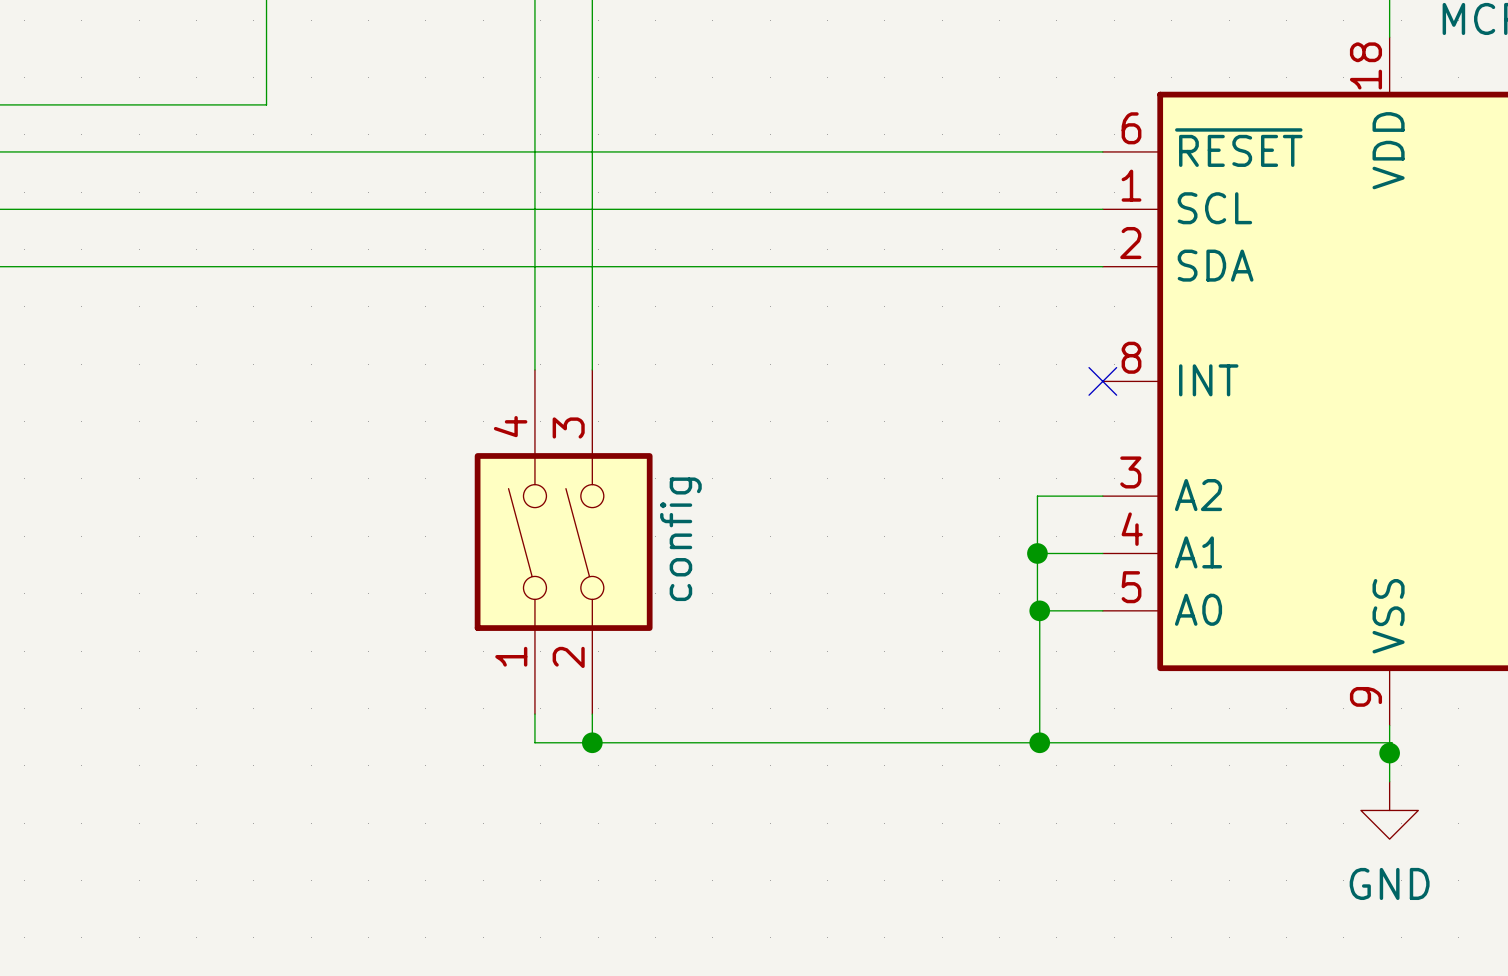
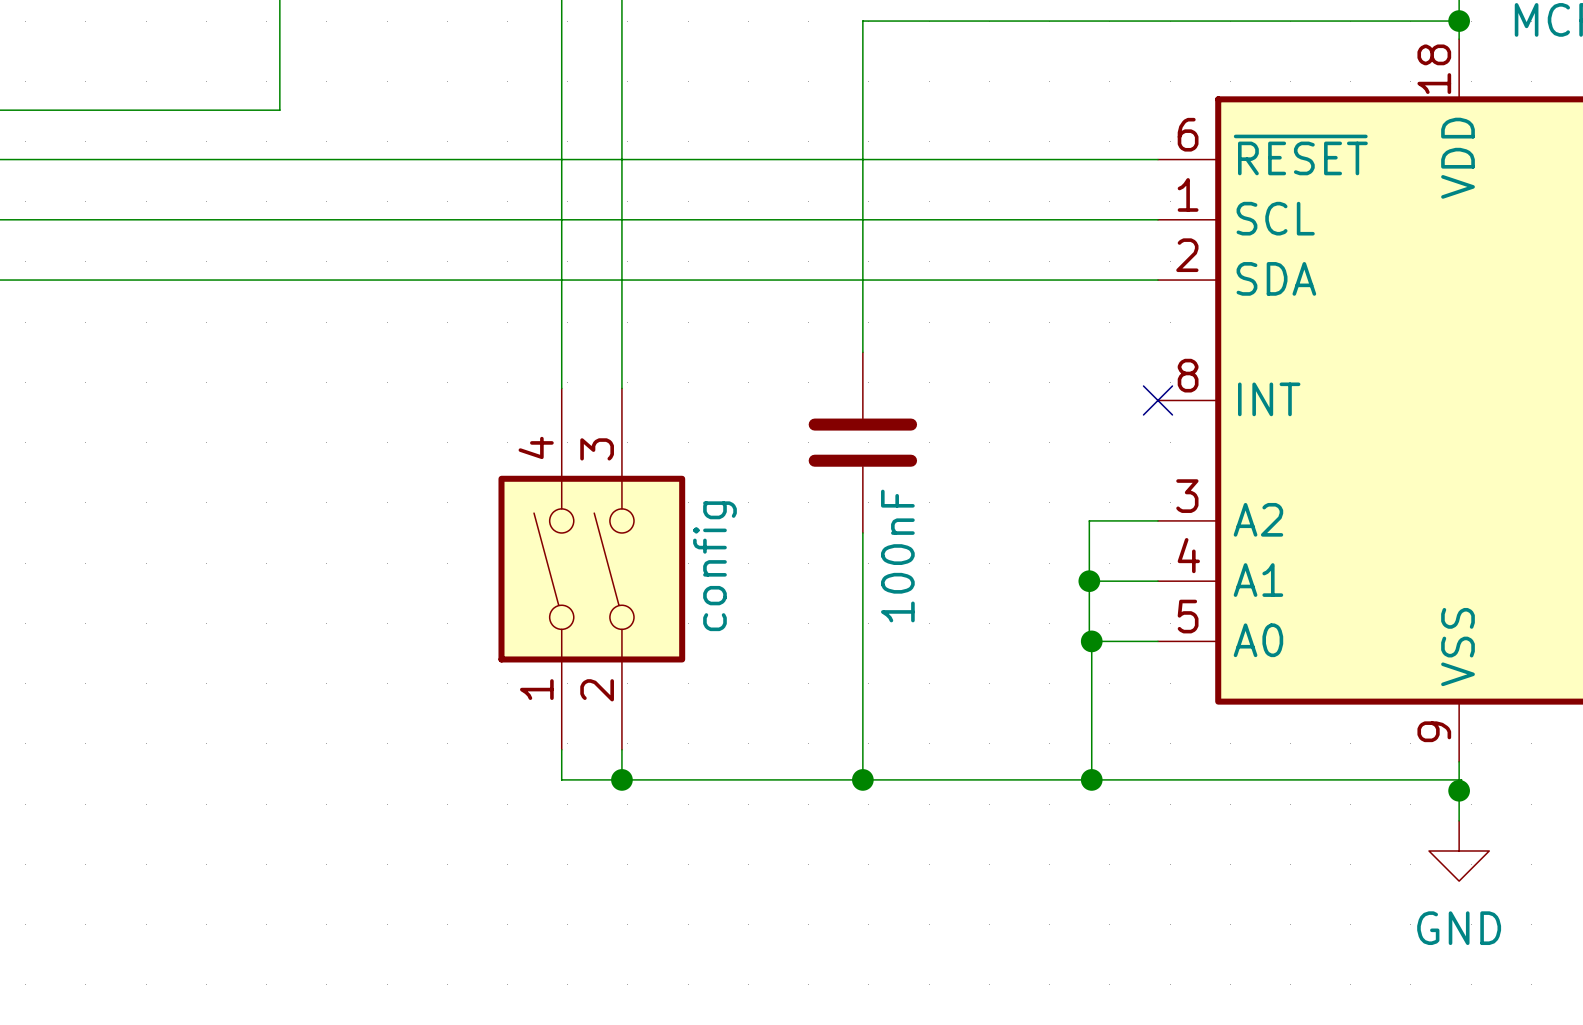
wire: none -> (1459, 21) (862, 21) (862, 352)
junction: none -> (1459, 21)
part: none -> 100nF (862, 442)
wire: none -> (862, 532) (862, 779)
junction: none -> (862, 779)

